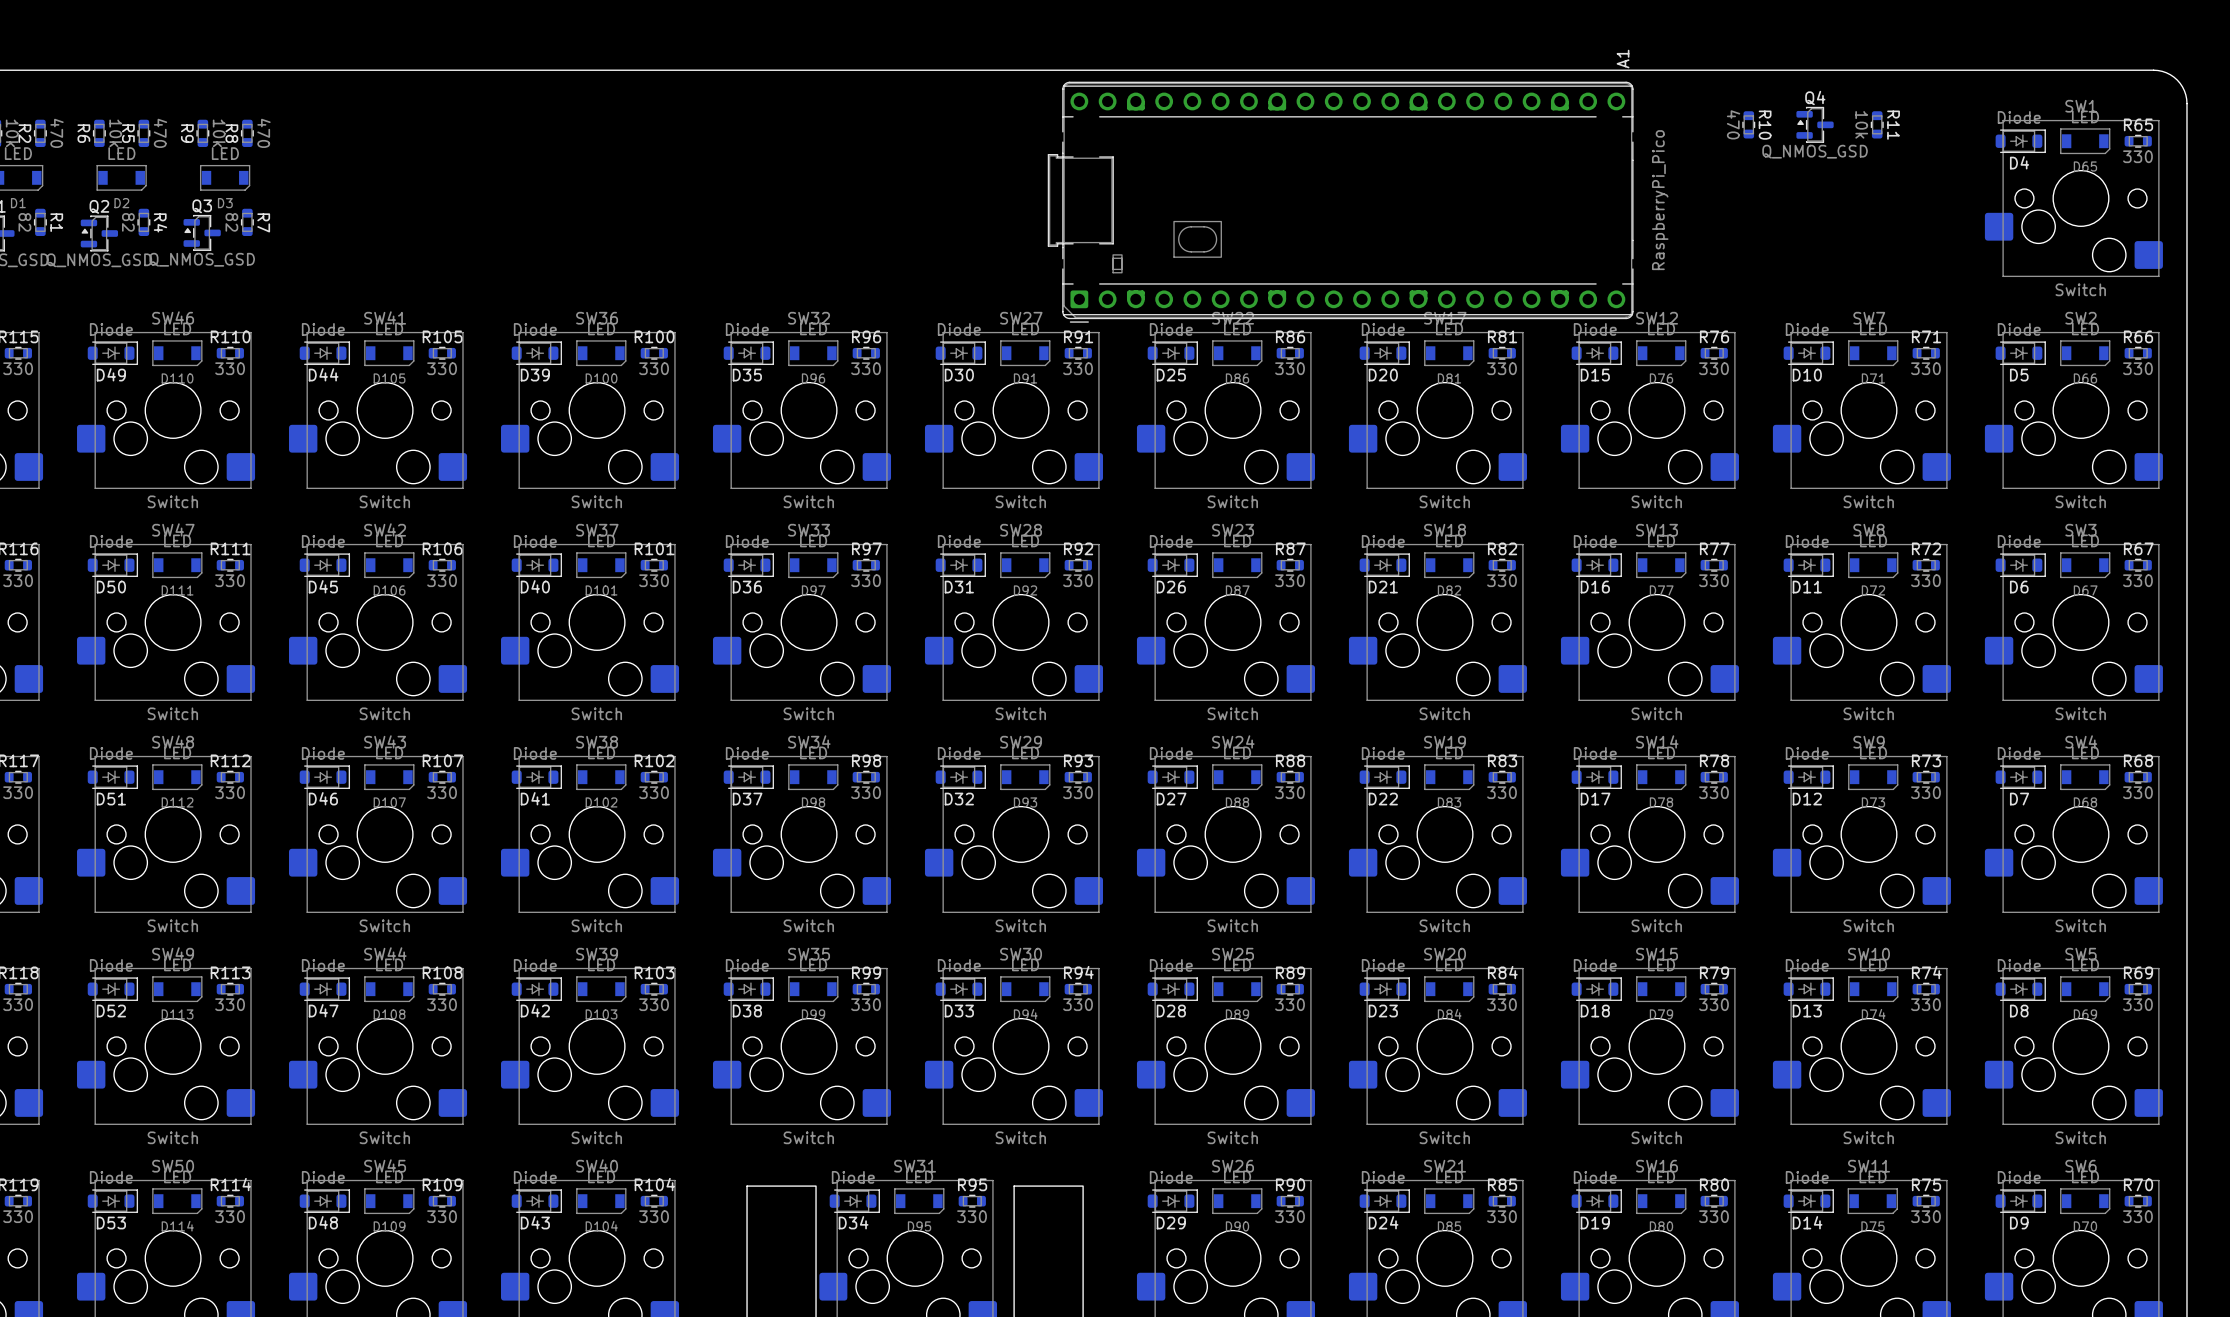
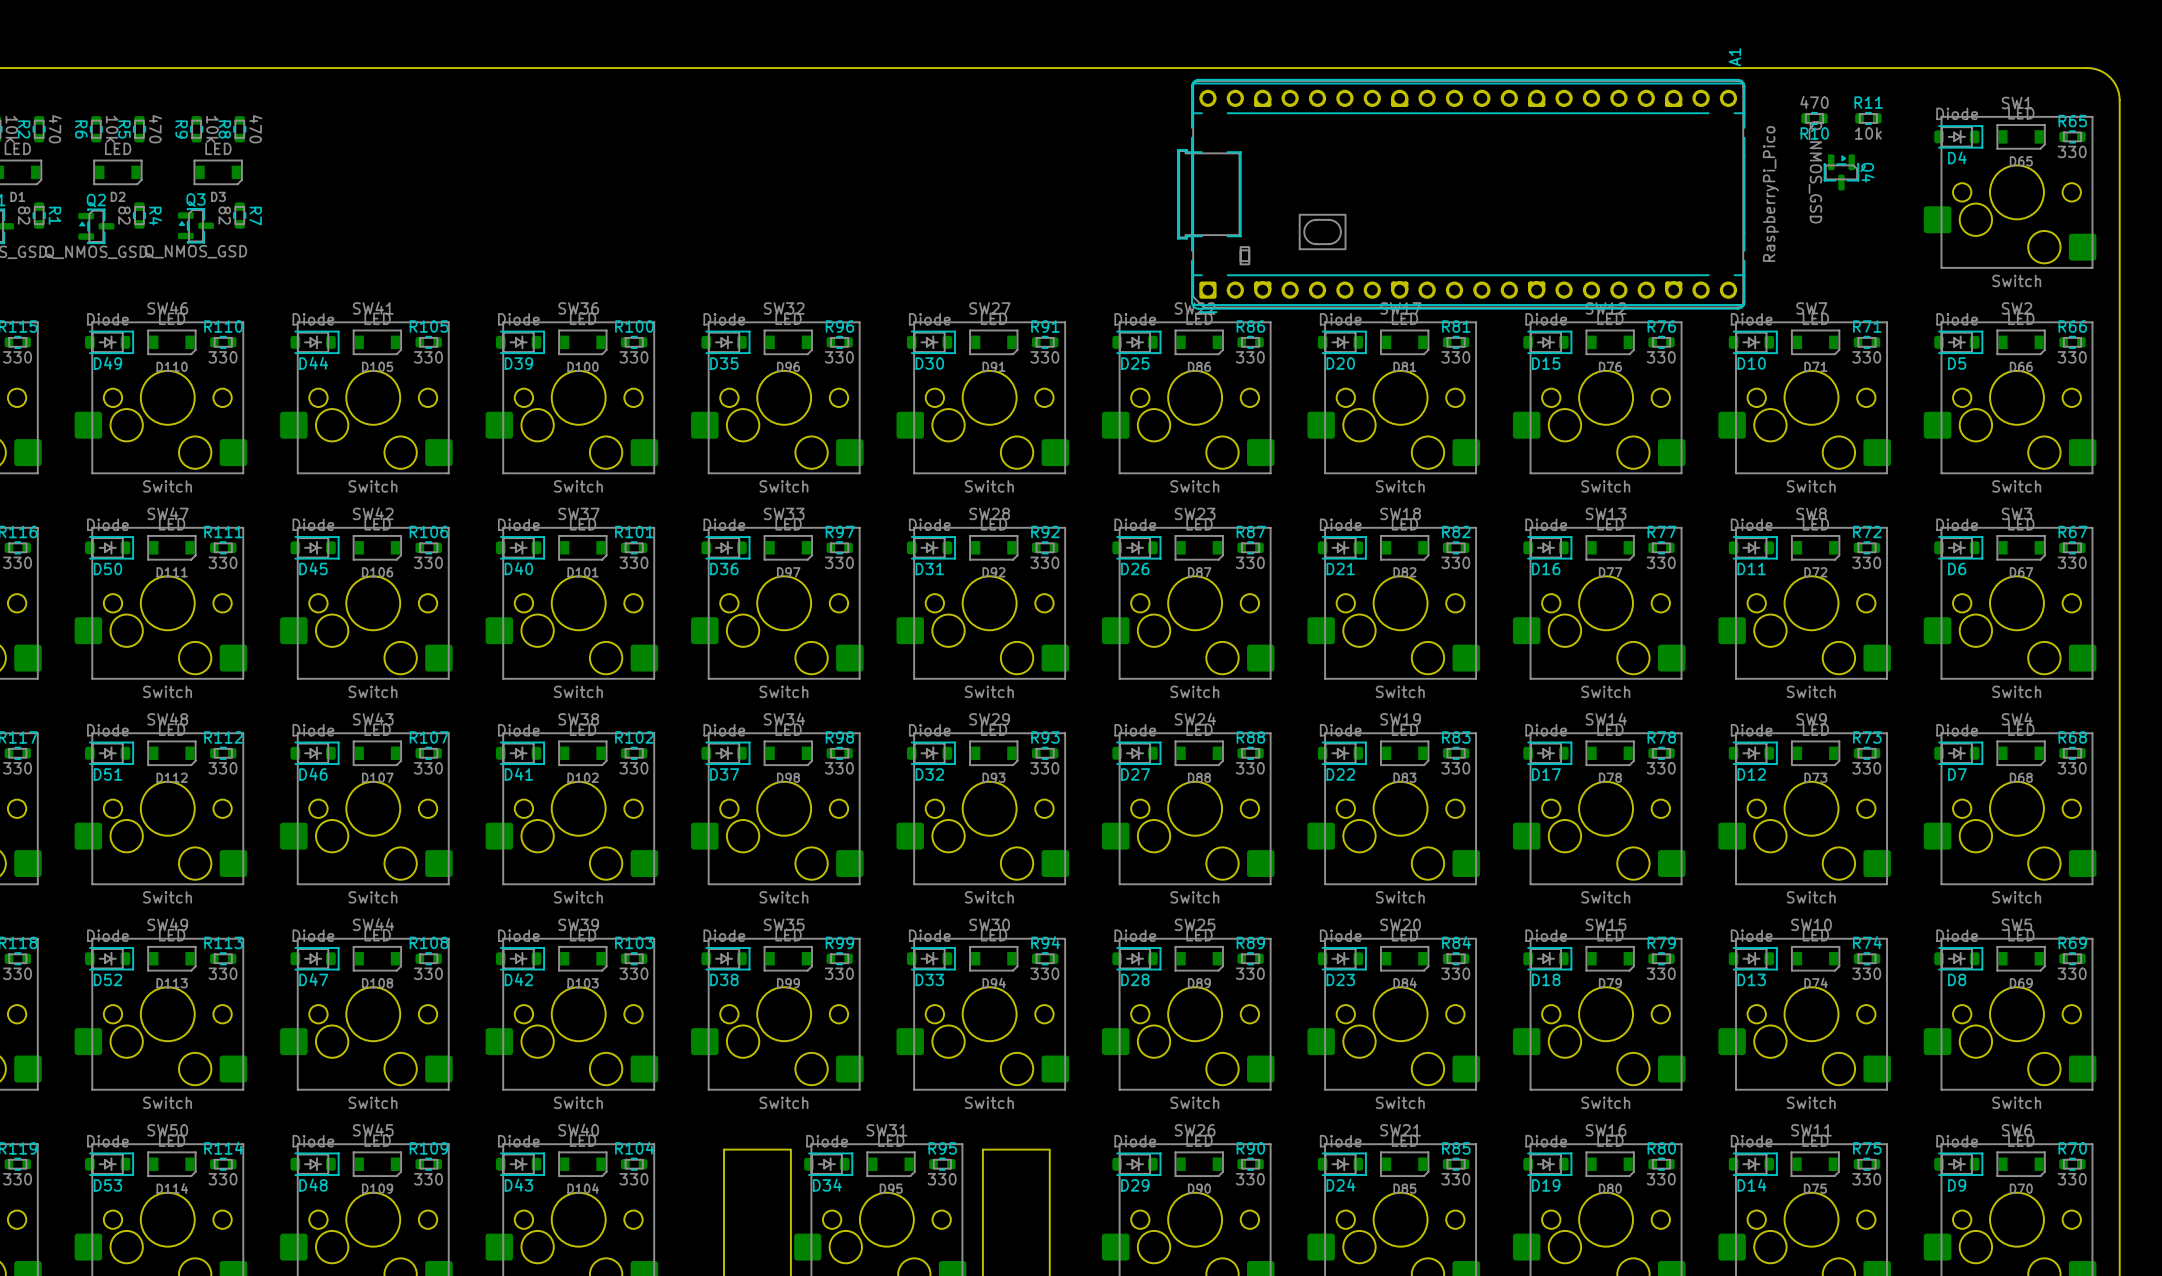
R10 rotation: 0° (1748, 124) -> 90° clockwise (1814, 118)
R10 position: (1748, 124) -> (1814, 118)
Q4 rotation: 0° (1815, 124) -> 90° clockwise (1841, 172)
Q4 position: (1815, 124) -> (1841, 172)
R11 value position: 10k (1861, 124) -> 10k (1868, 133)
R11 rotation: 0° (1877, 124) -> 90° clockwise (1868, 118)
R11 position: (1877, 124) -> (1868, 118)
R11 name position: R11 (1893, 125) -> R11 (1868, 102)
A1 position: (1340, 202) -> (1461, 195)

